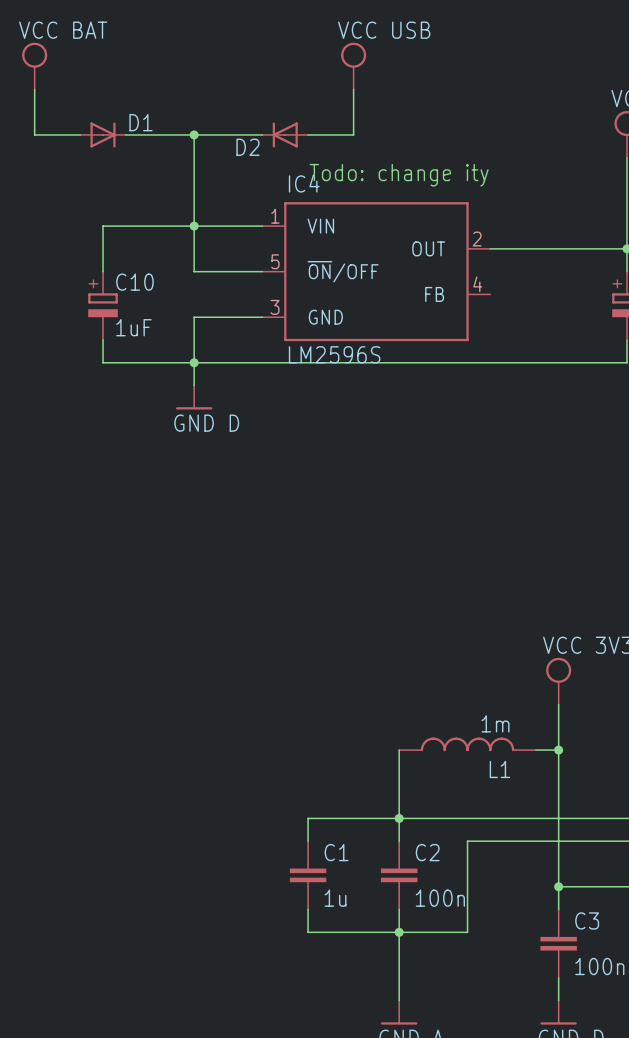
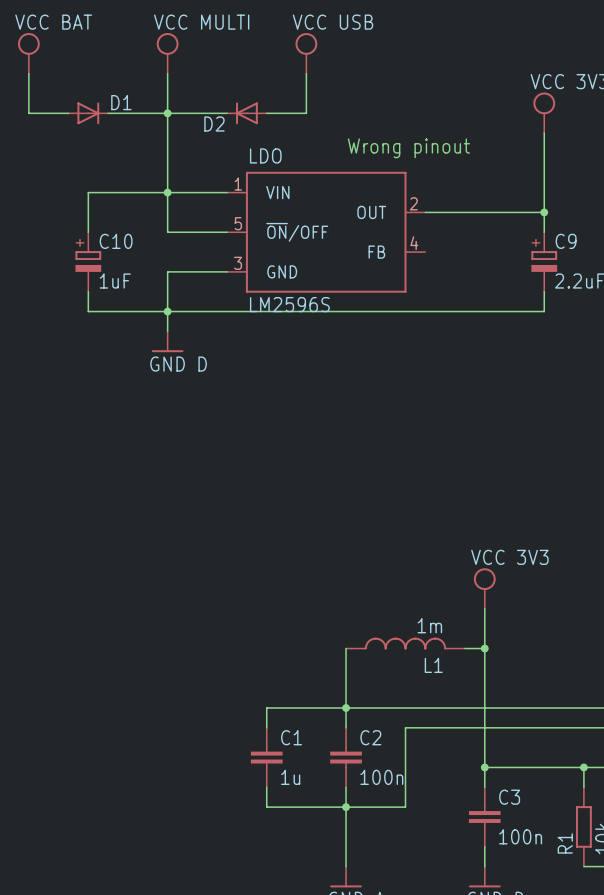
power symbol: none -> VCC MULTI (167, 53)
wire: none -> (167, 73) (167, 113)
text: Todo: change ity (399, 175) -> none
text: none -> Wrong pinout (408, 148)
IC4 name: IC4 (304, 183) -> LDO (265, 155)

